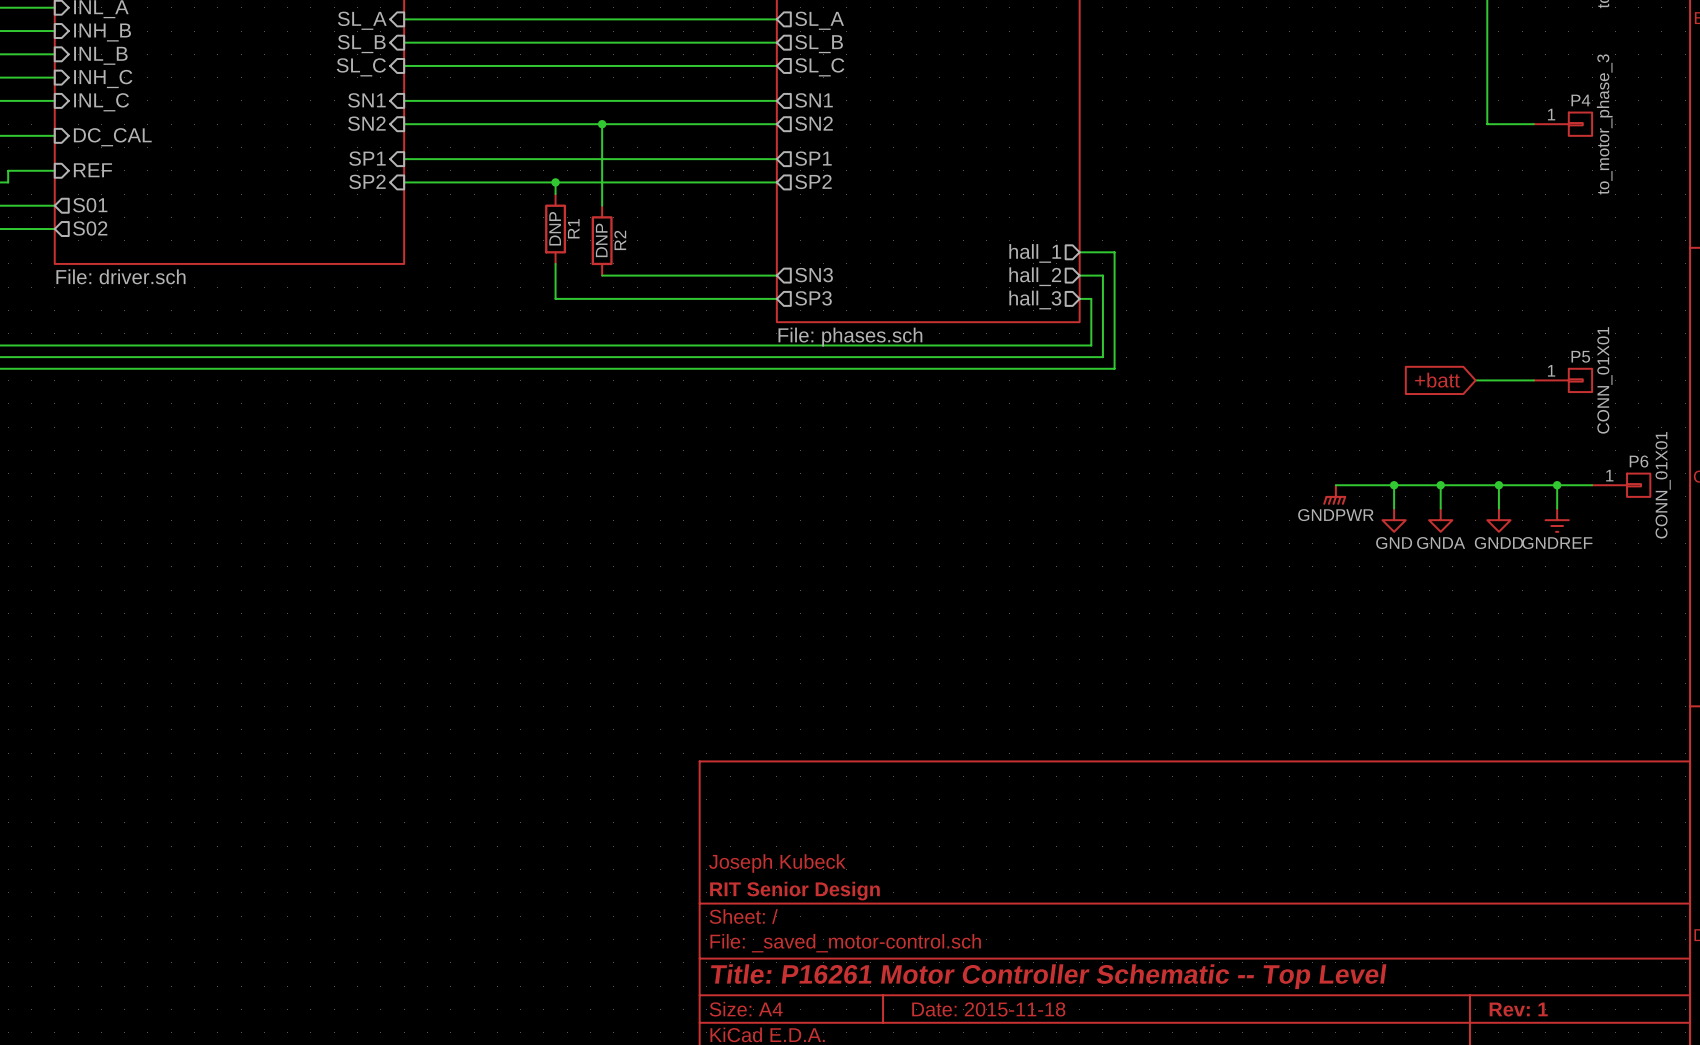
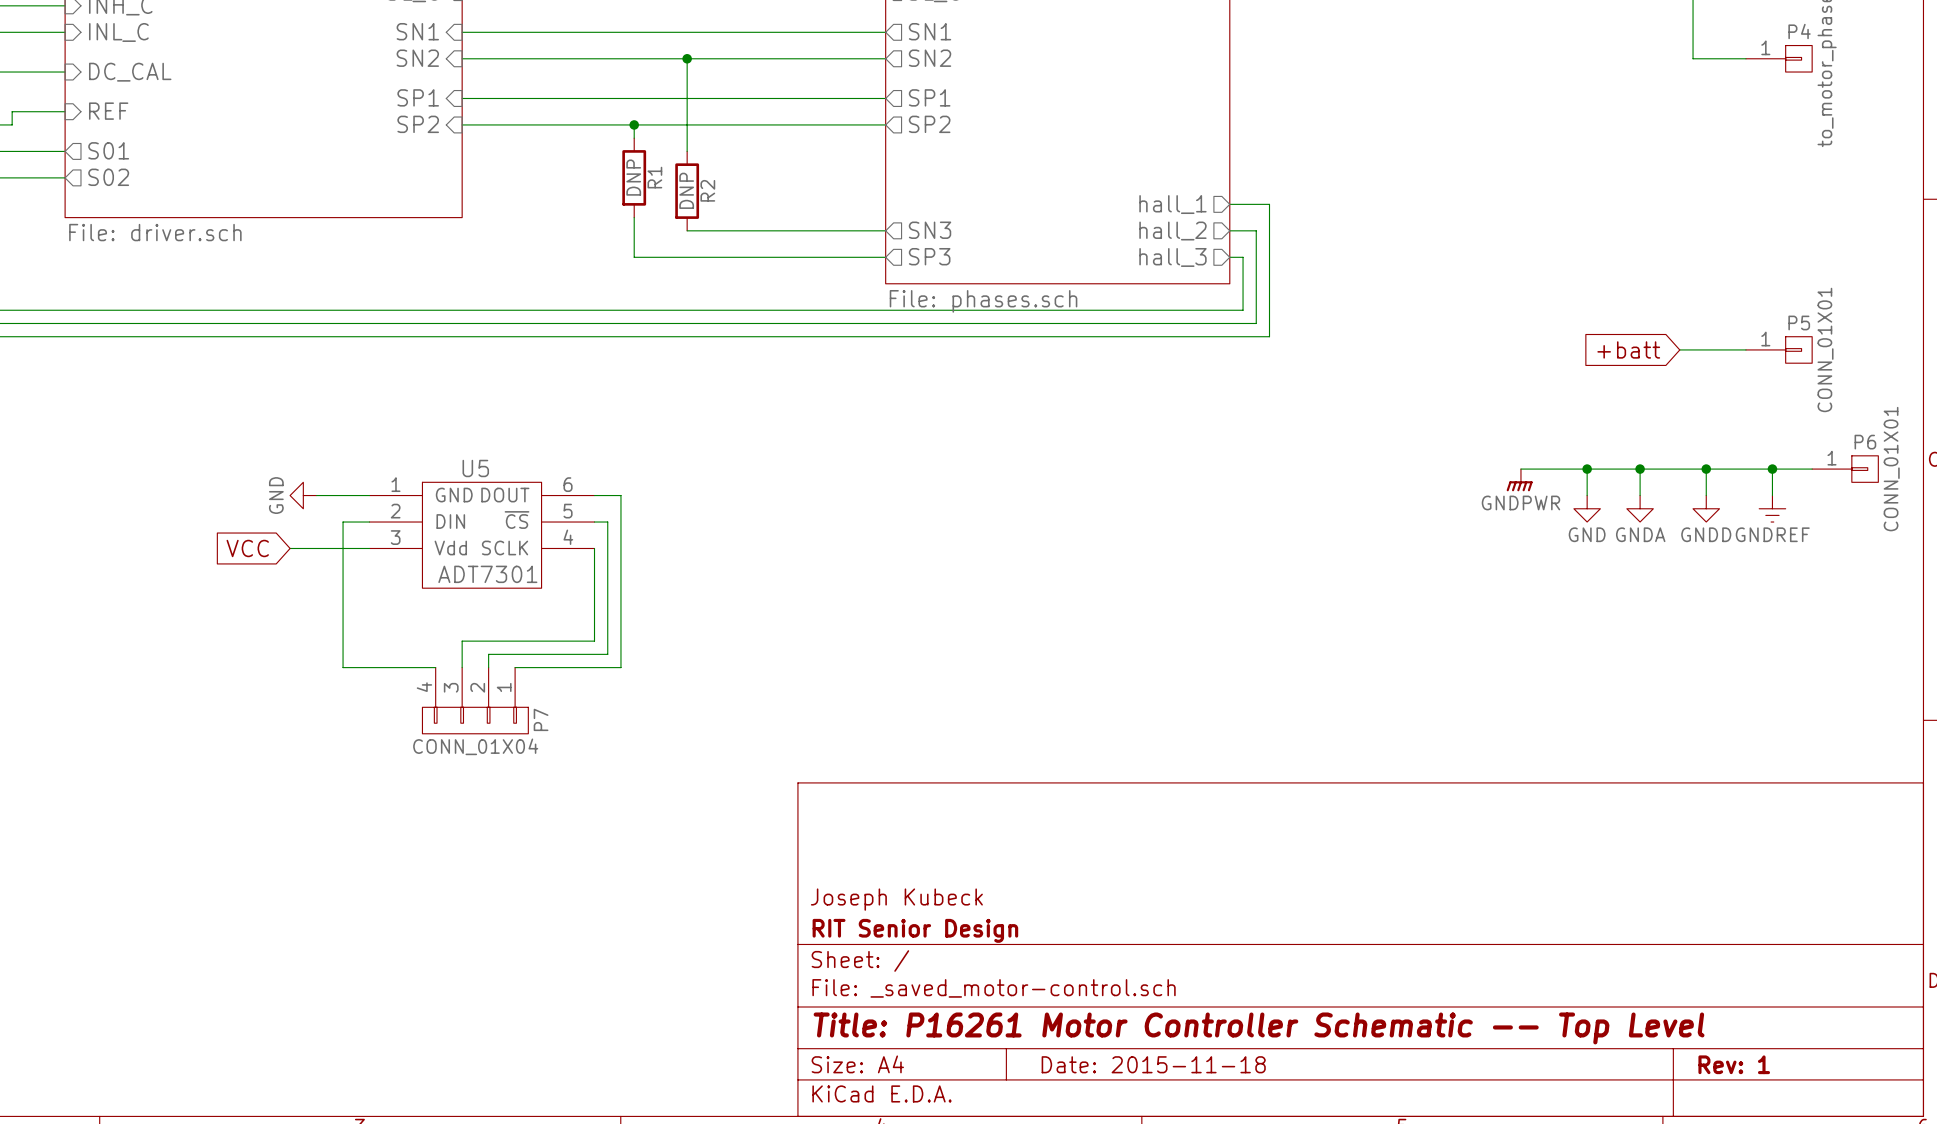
power symbol: none -> GND (303, 495)
wire: none -> (316, 495) (369, 495)
wire: none -> (594, 495) (620, 495) (620, 667) (515, 667)
wire: none -> (369, 522) (343, 522) (343, 667) (435, 667)
wire: none -> (594, 522) (607, 522) (607, 654) (488, 654) (488, 667)
U5: none -> ADT7301 (482, 535)
global label: none -> VCC (247, 548)
wire: none -> (290, 548) (369, 548)
wire: none -> (594, 548) (594, 641) (462, 641) (462, 667)
P7: none -> CONN_01X04 (475, 700)

